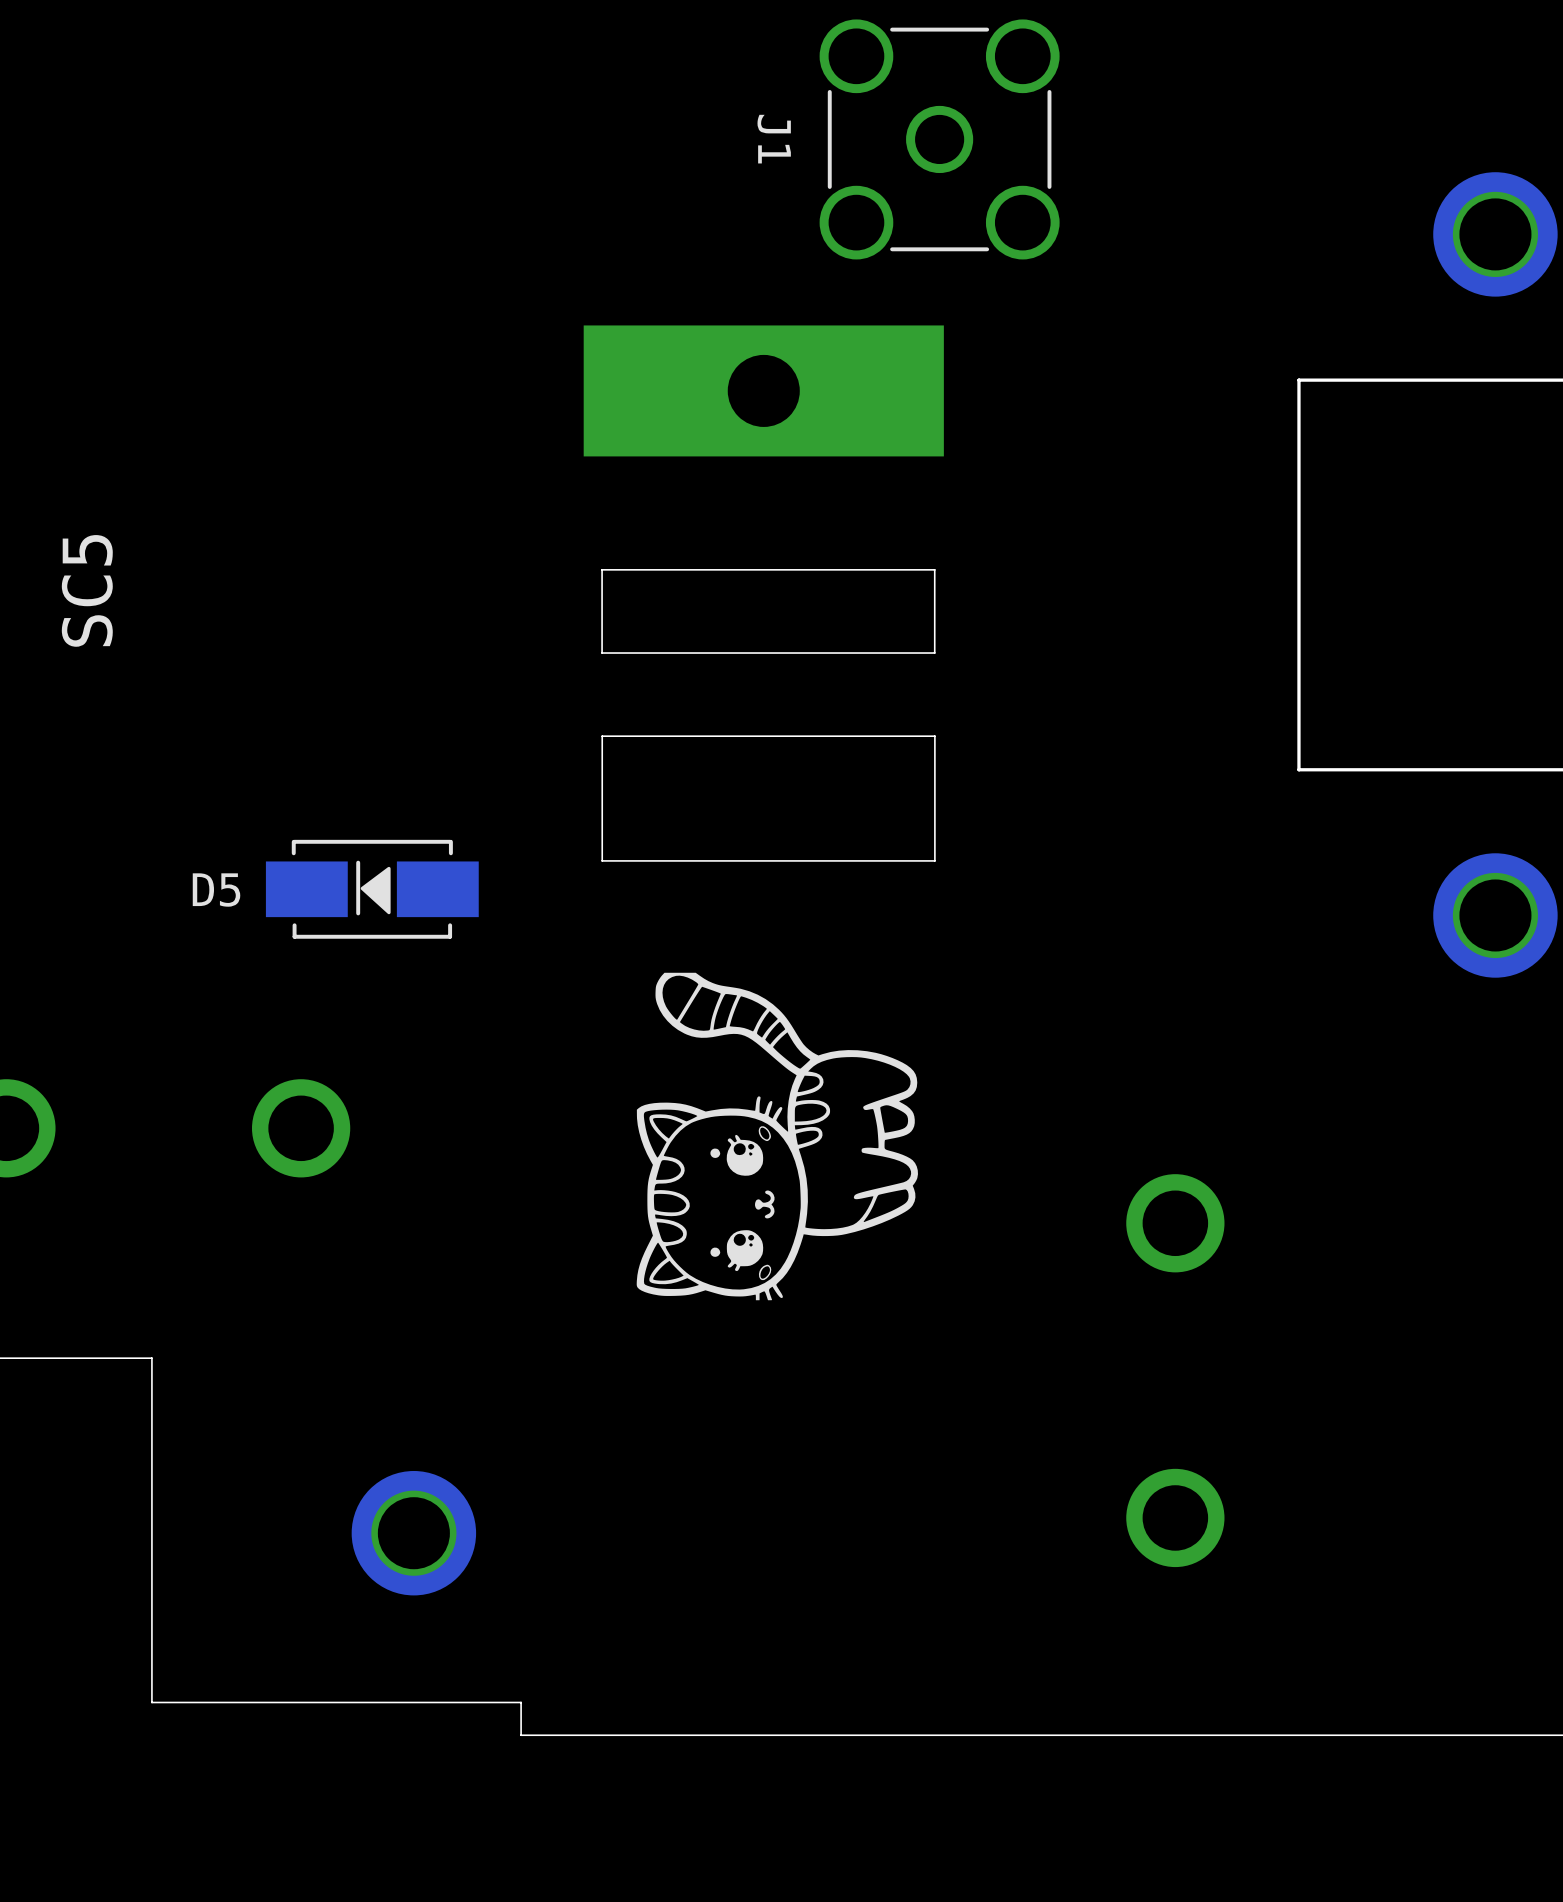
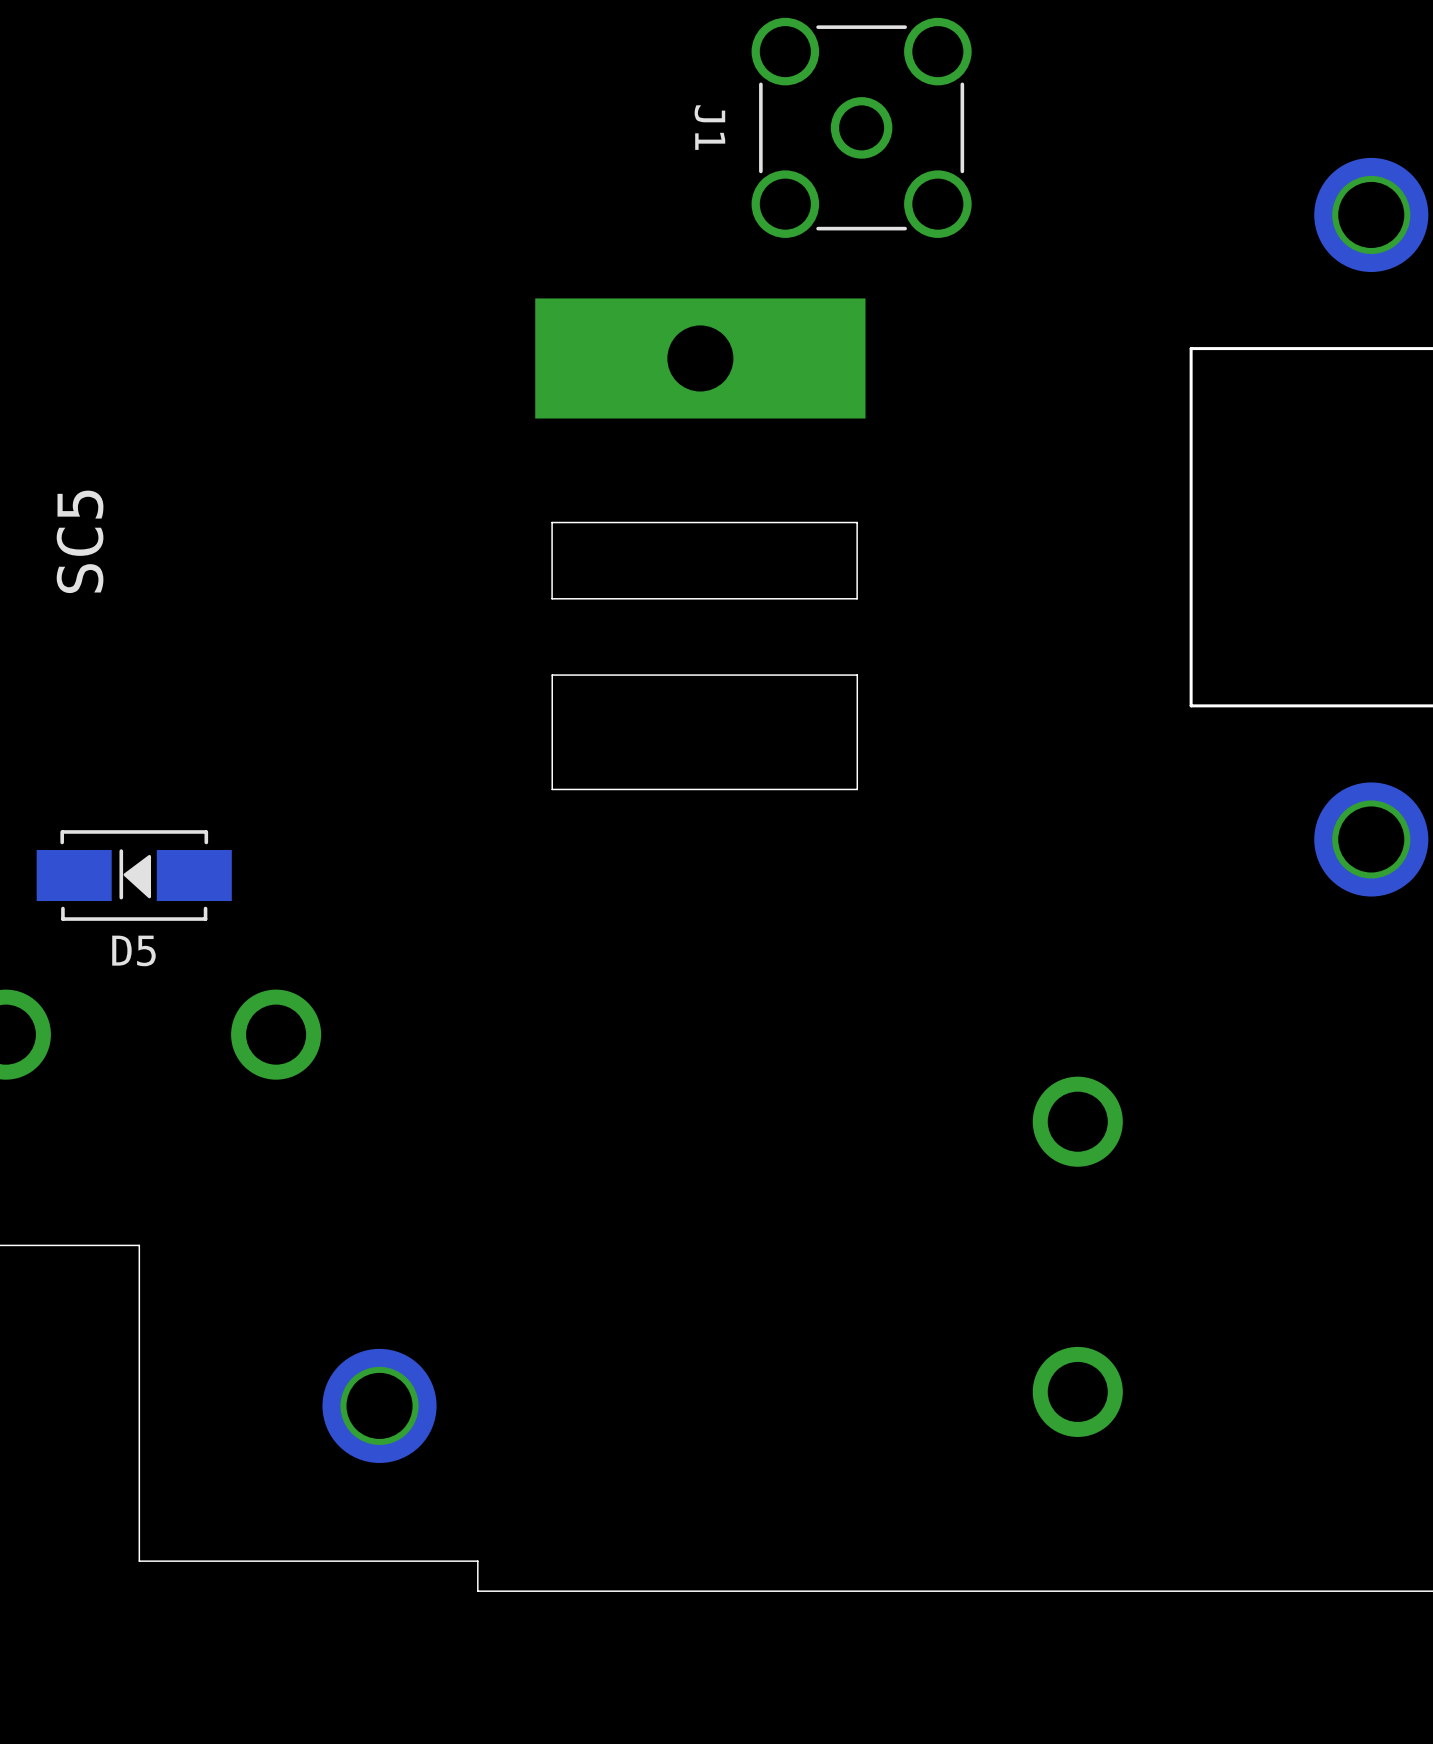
D5 position: (372, 889) -> (134, 875)
D5 name position: D5 (216, 890) -> D5 (133, 950)
drawing: [636, 972, 918, 1301] -> none

